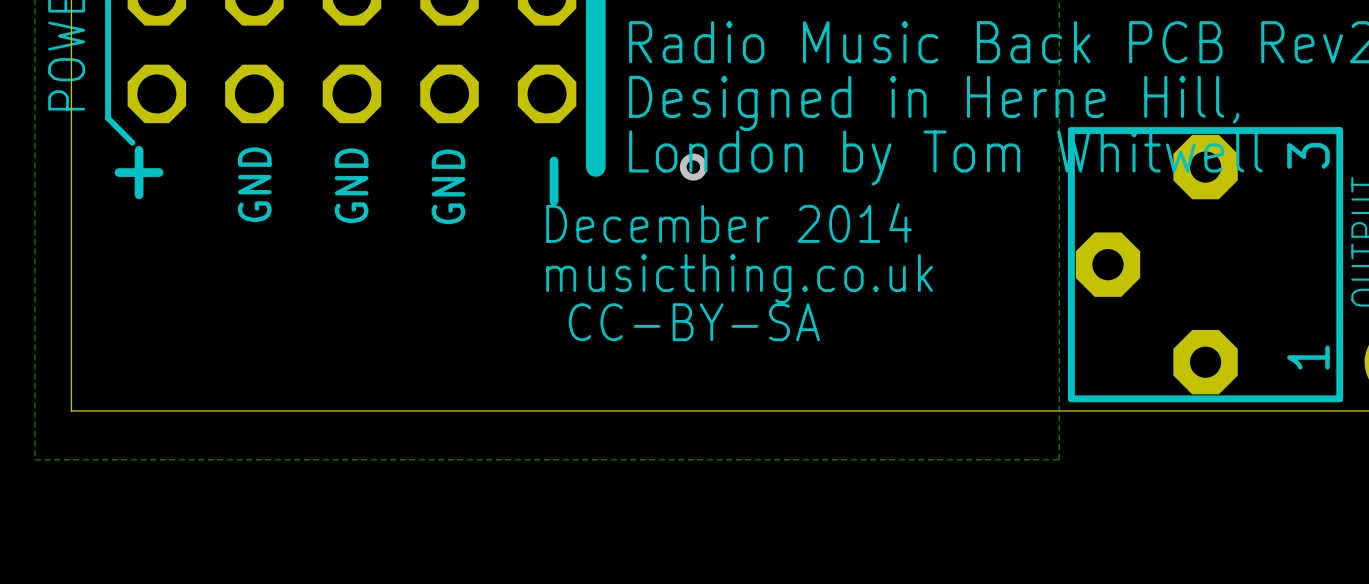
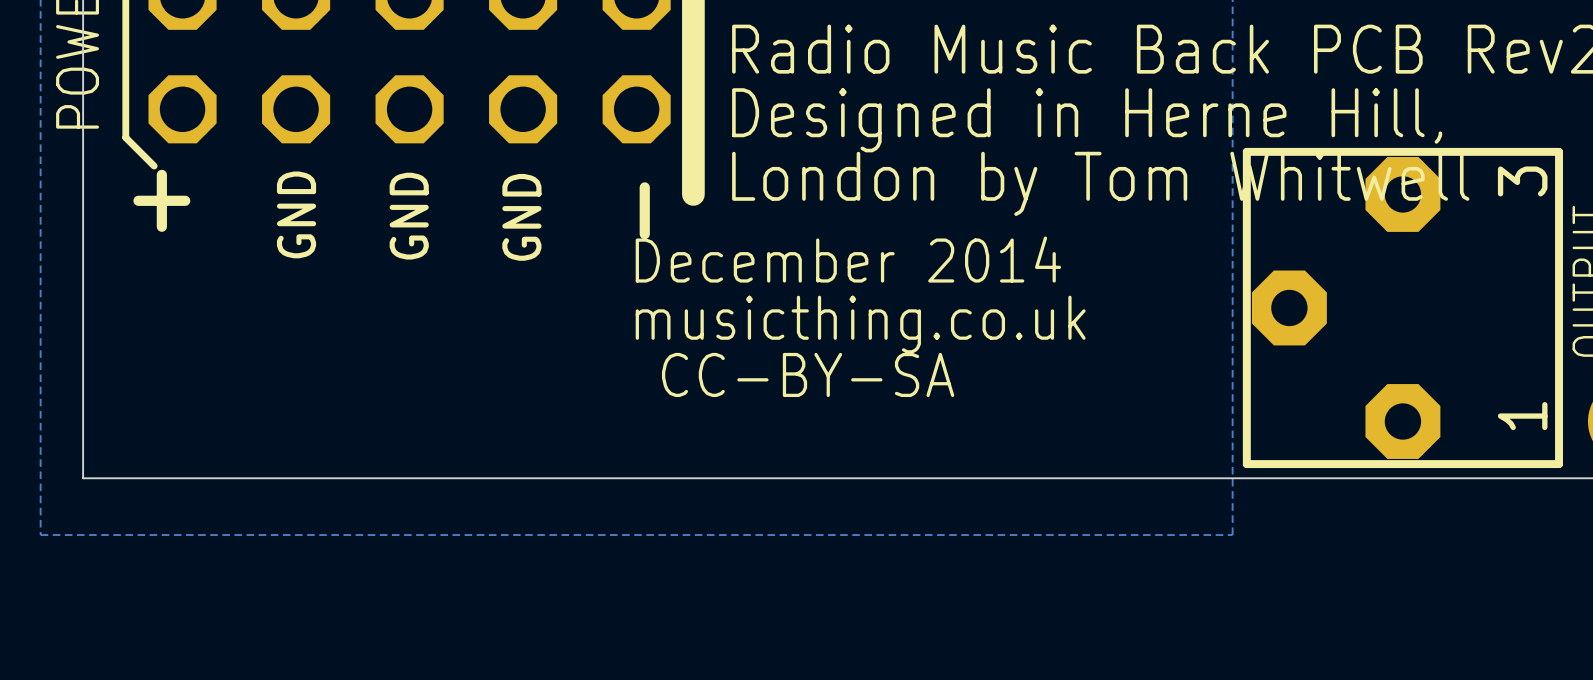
via: (693, 167) -> none

